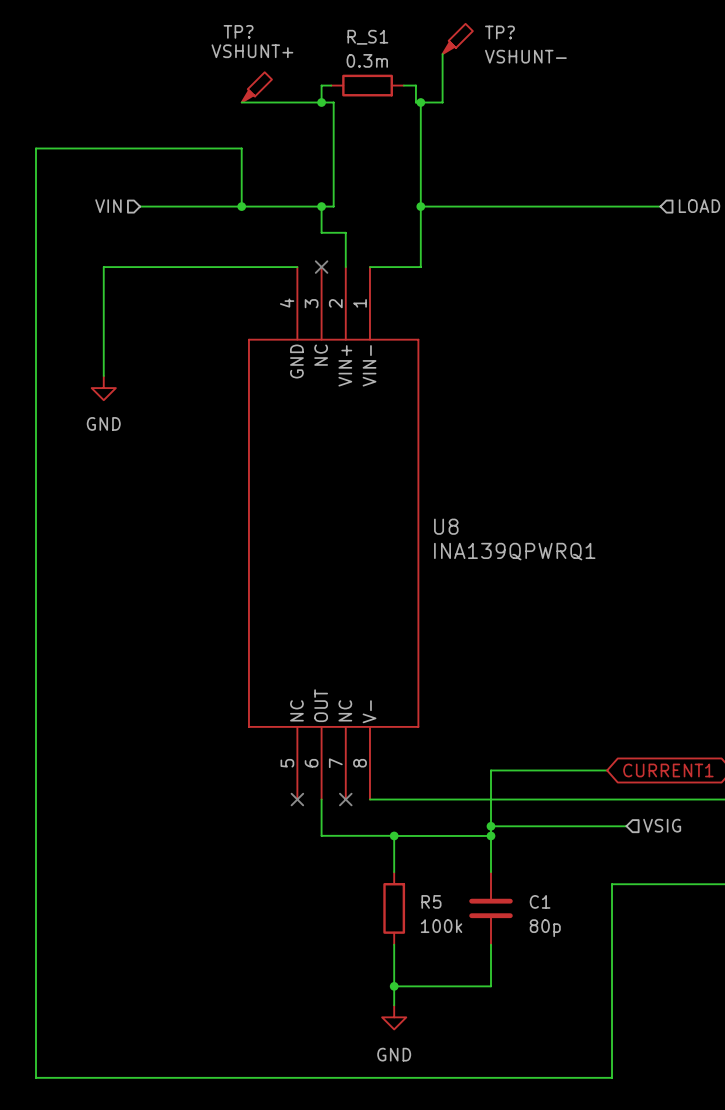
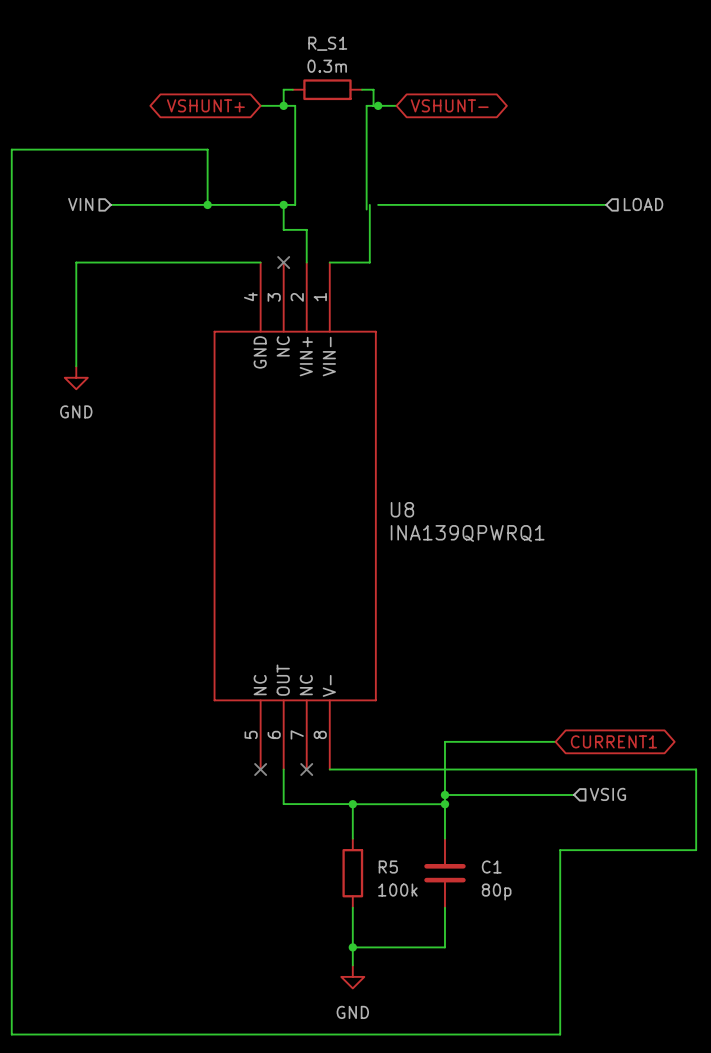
TP?: VSHUNT- (457, 38) -> none
wire: (442, 54) (442, 102) (440, 102) -> none
TP?: VSHUNT+ (256, 87) -> none
global label: none -> VSHUNT+ (205, 105)
wire: (241, 102) (297, 102) -> none
wire: none -> (373, 105) (366, 105) (366, 209)
wire: (420, 102) (420, 267) (412, 267) -> (369, 204) (369, 262)
global label: none -> VSHUNT- (449, 105)
junction: (420, 206) -> none

